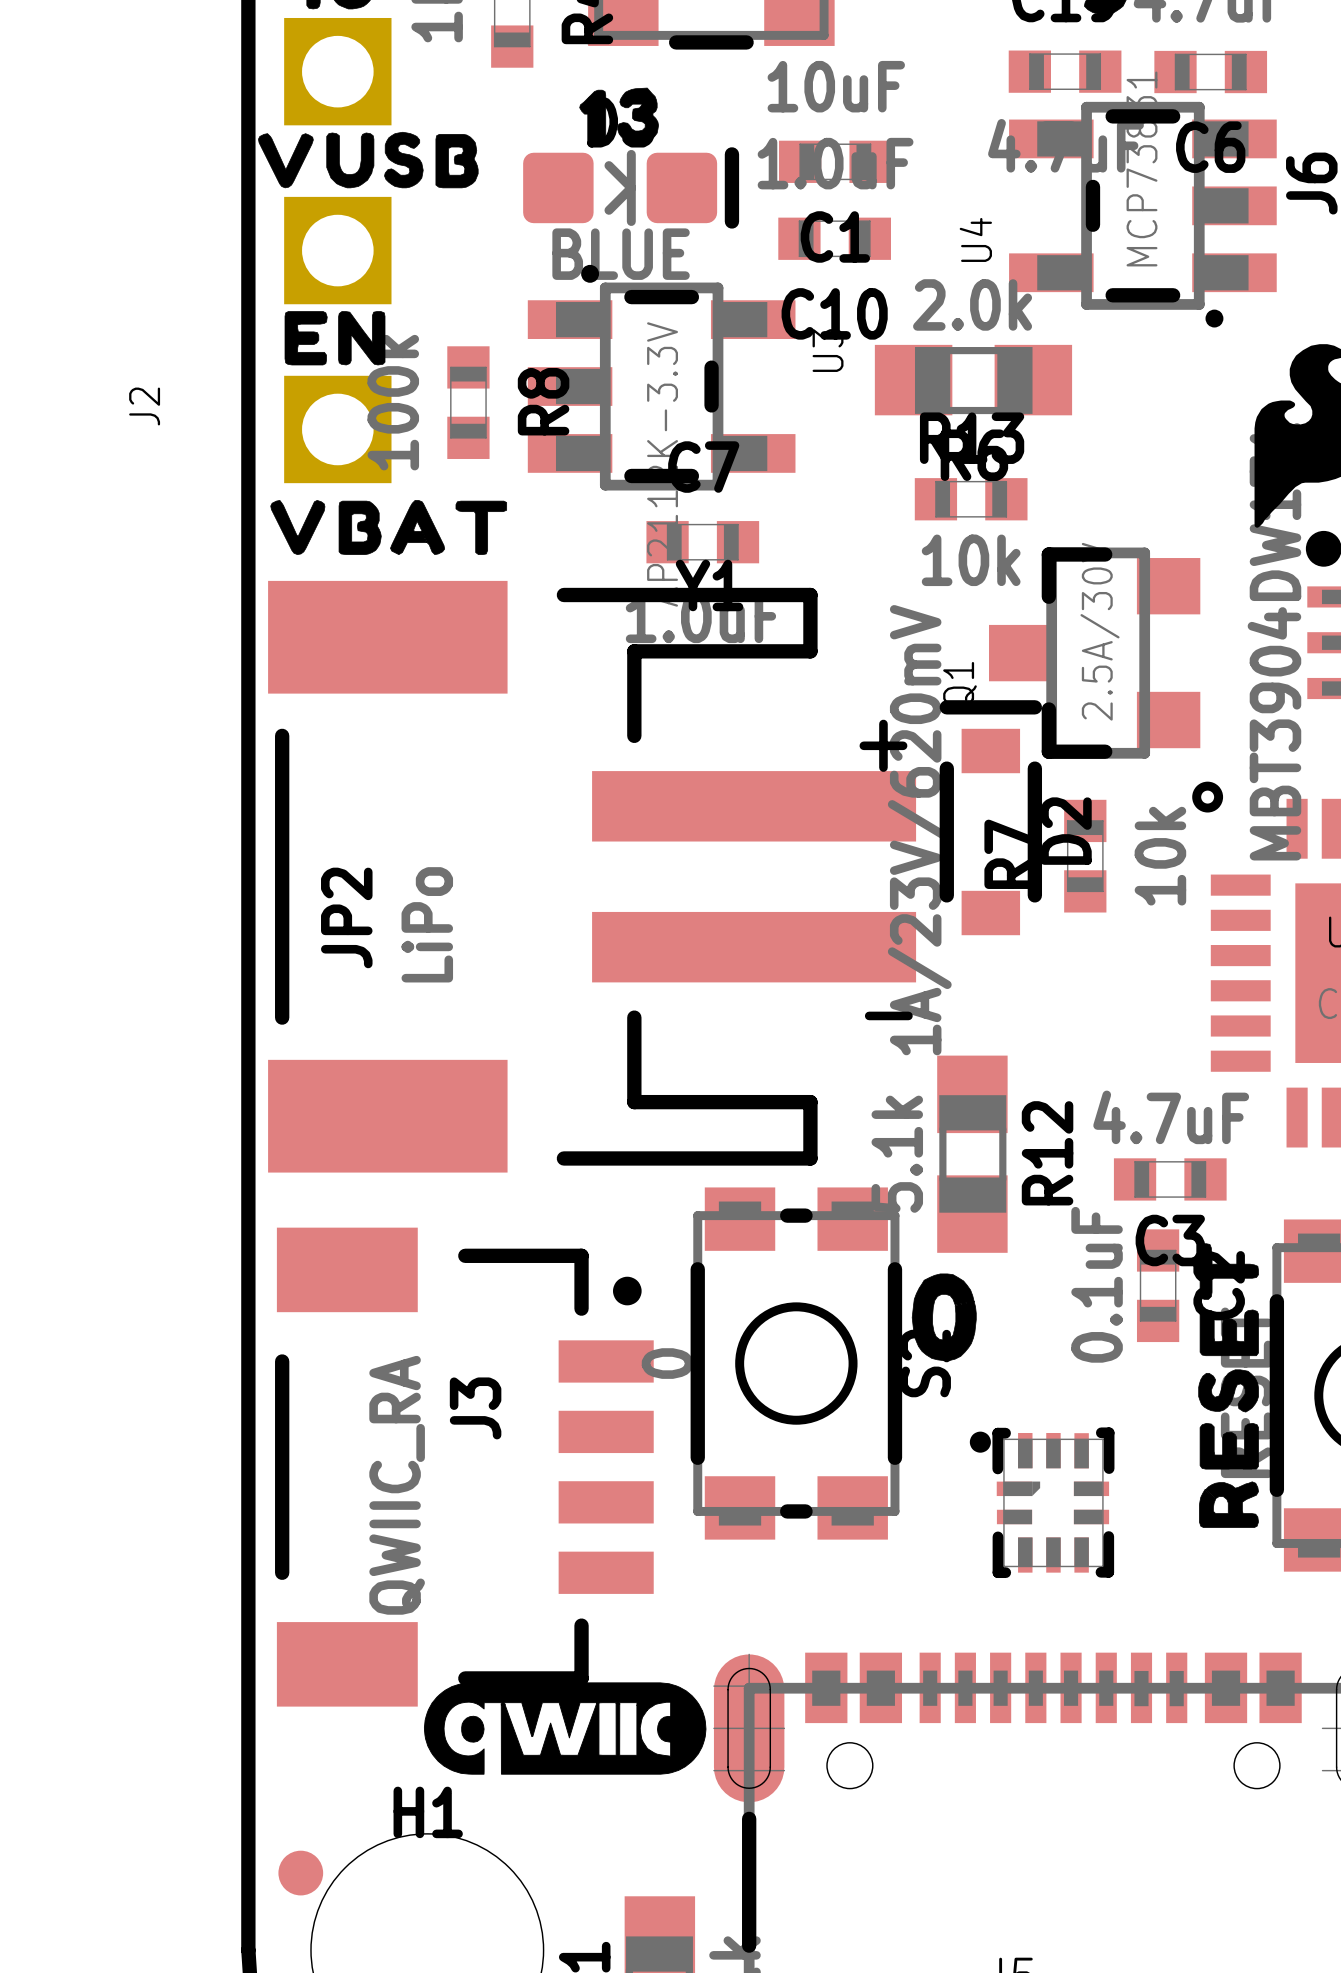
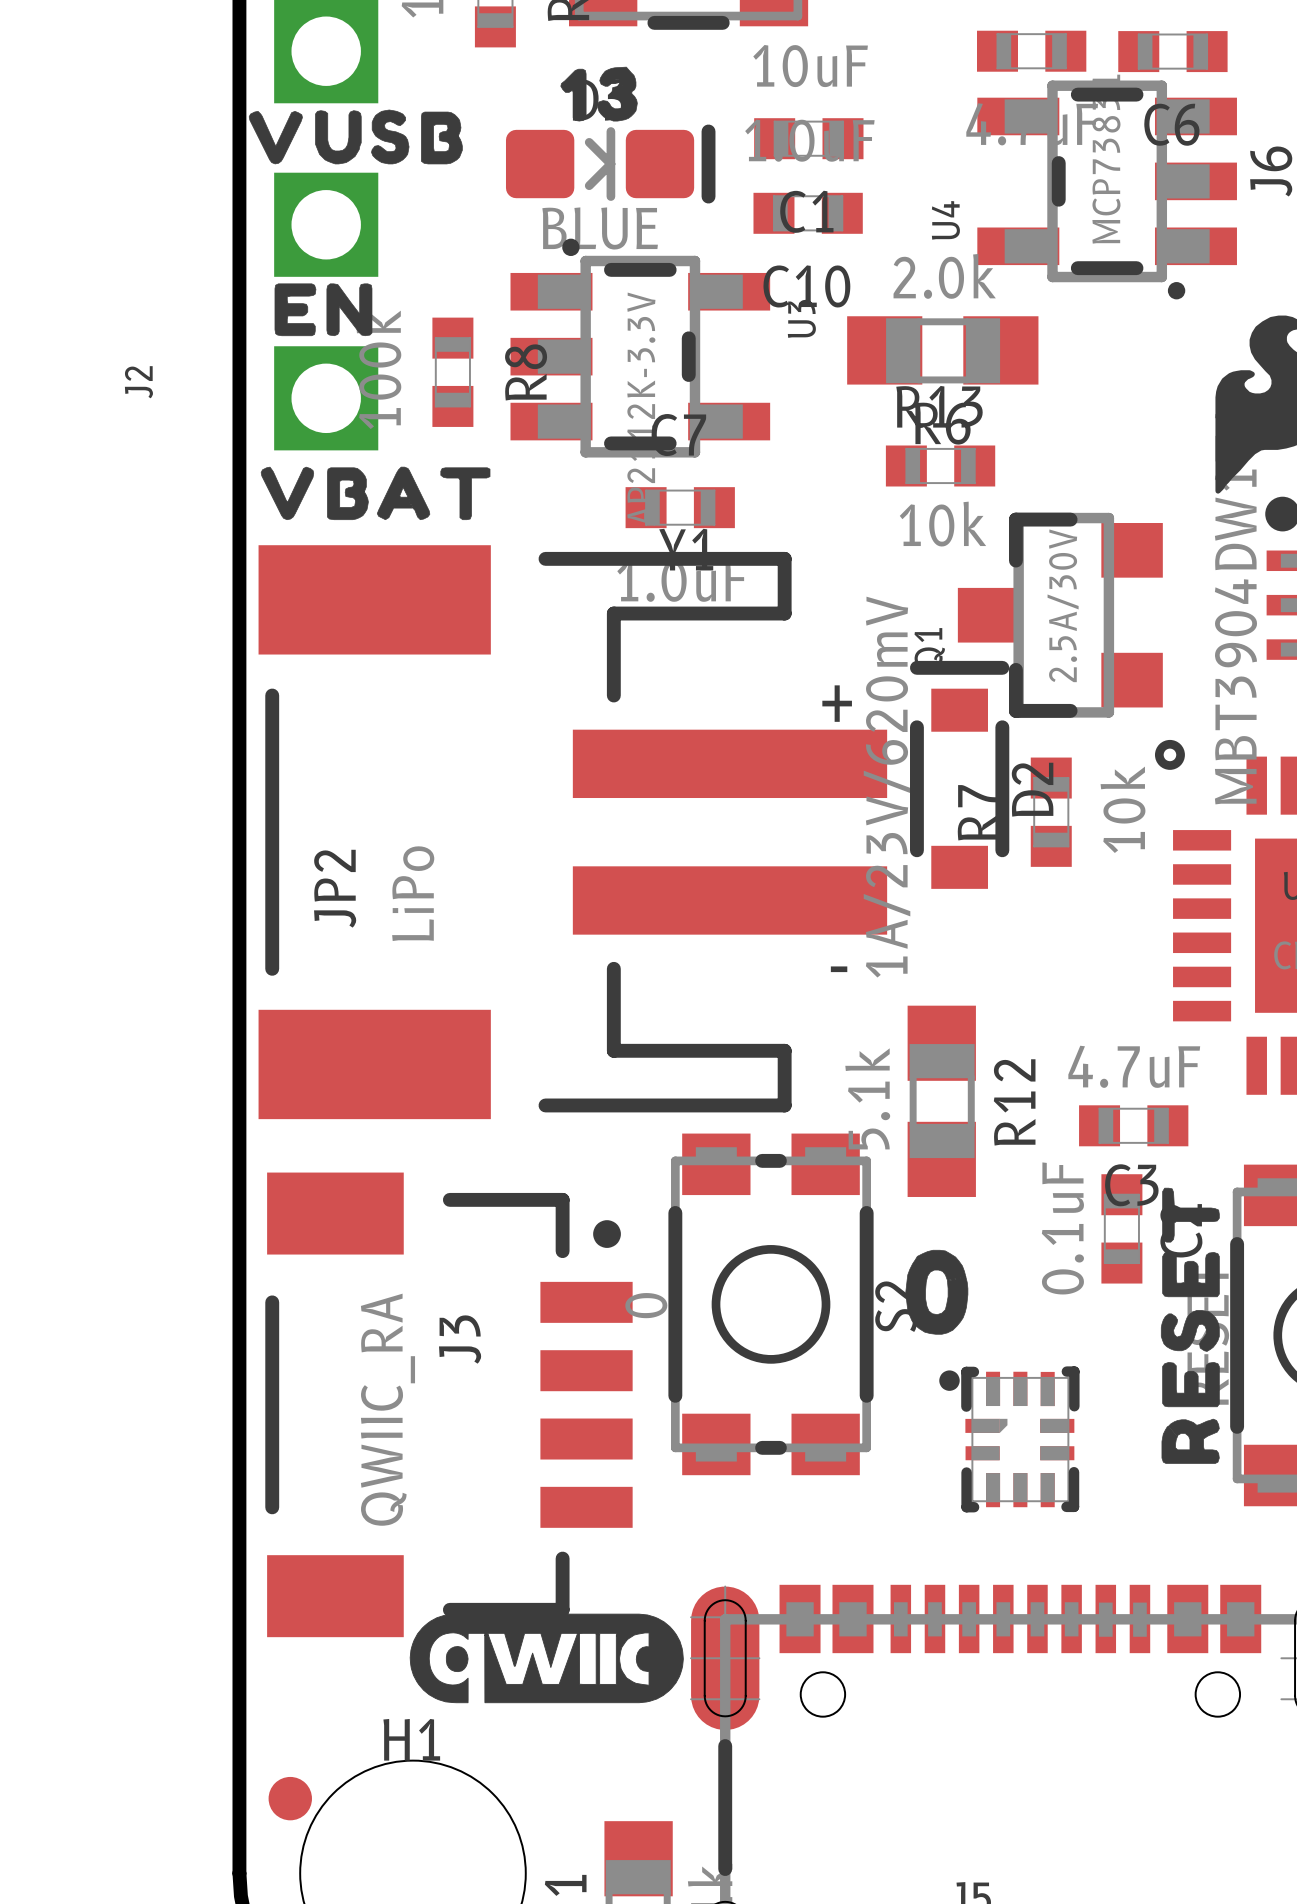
drawing position: (944, 1317) -> (936, 1292)

